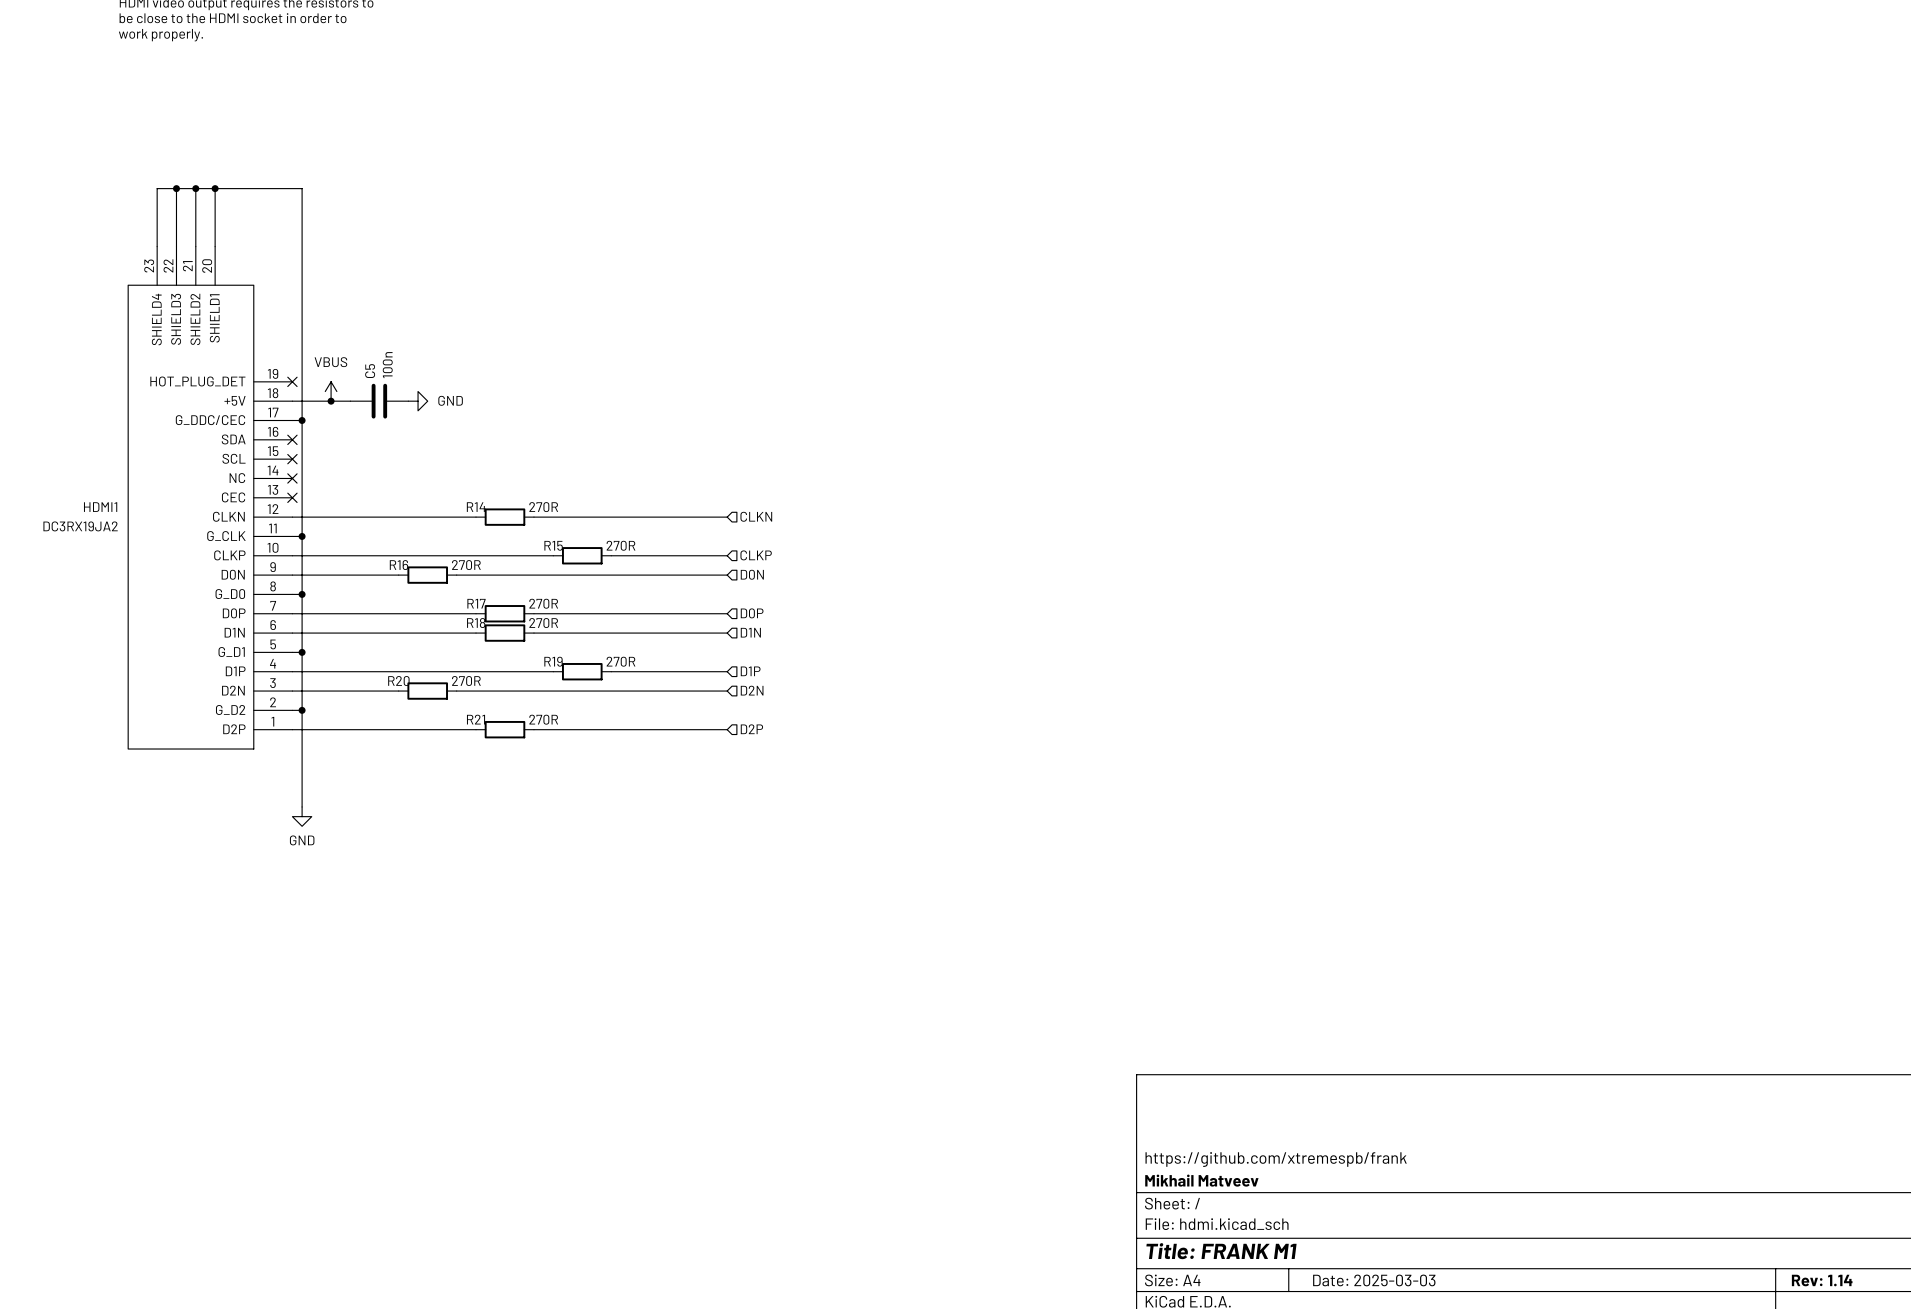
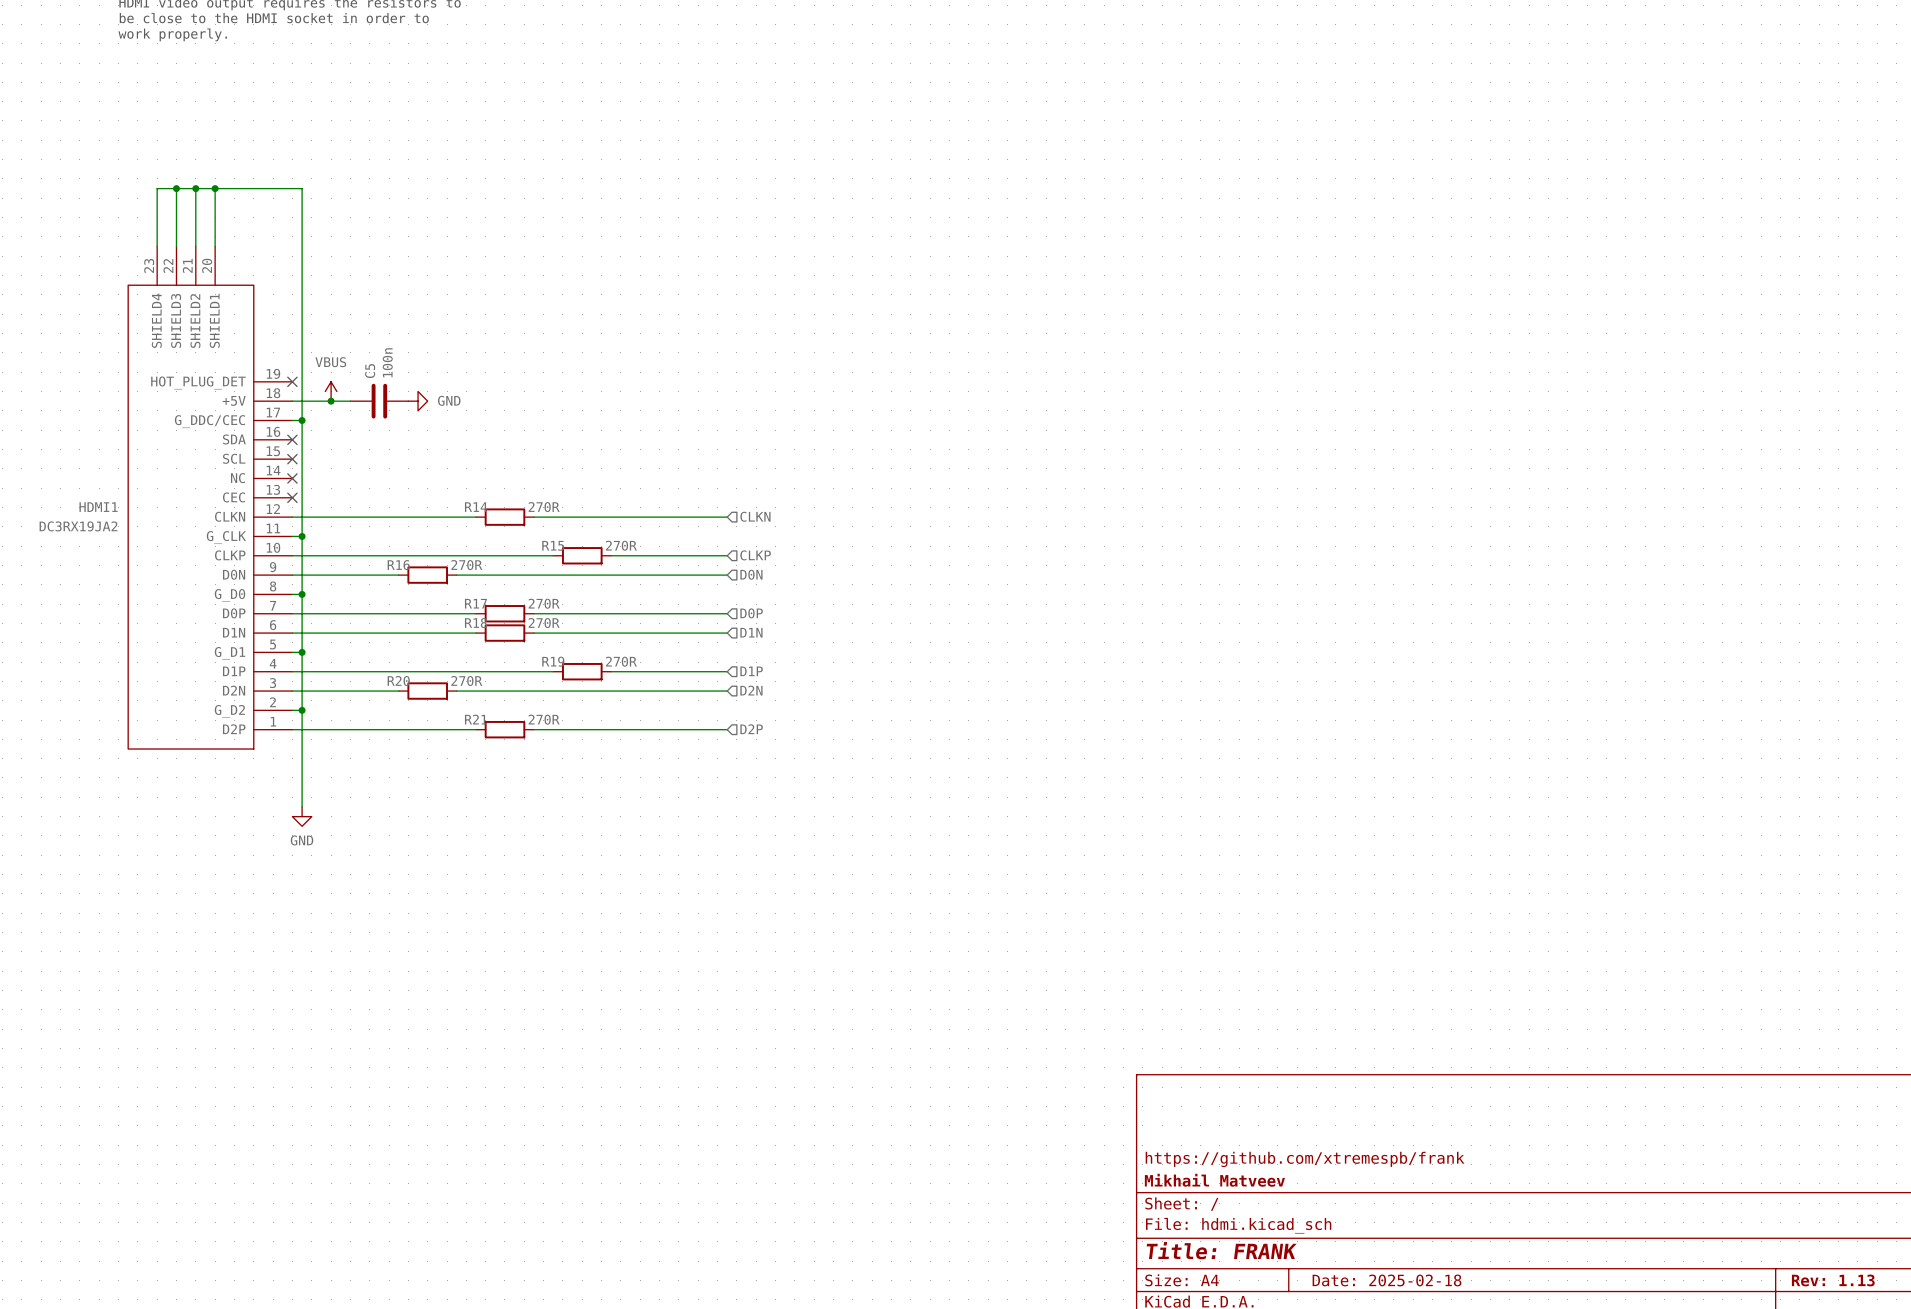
title block: Title: FRANK M1 (1221, 1251) -> Title: FRANK (1221, 1250)
title block: Date: 2025-03-03 (1374, 1280) -> Date: 2025-02-18 (1386, 1280)
title block: Rev: 1.14 (1822, 1280) -> Rev: 1.13 (1833, 1280)

